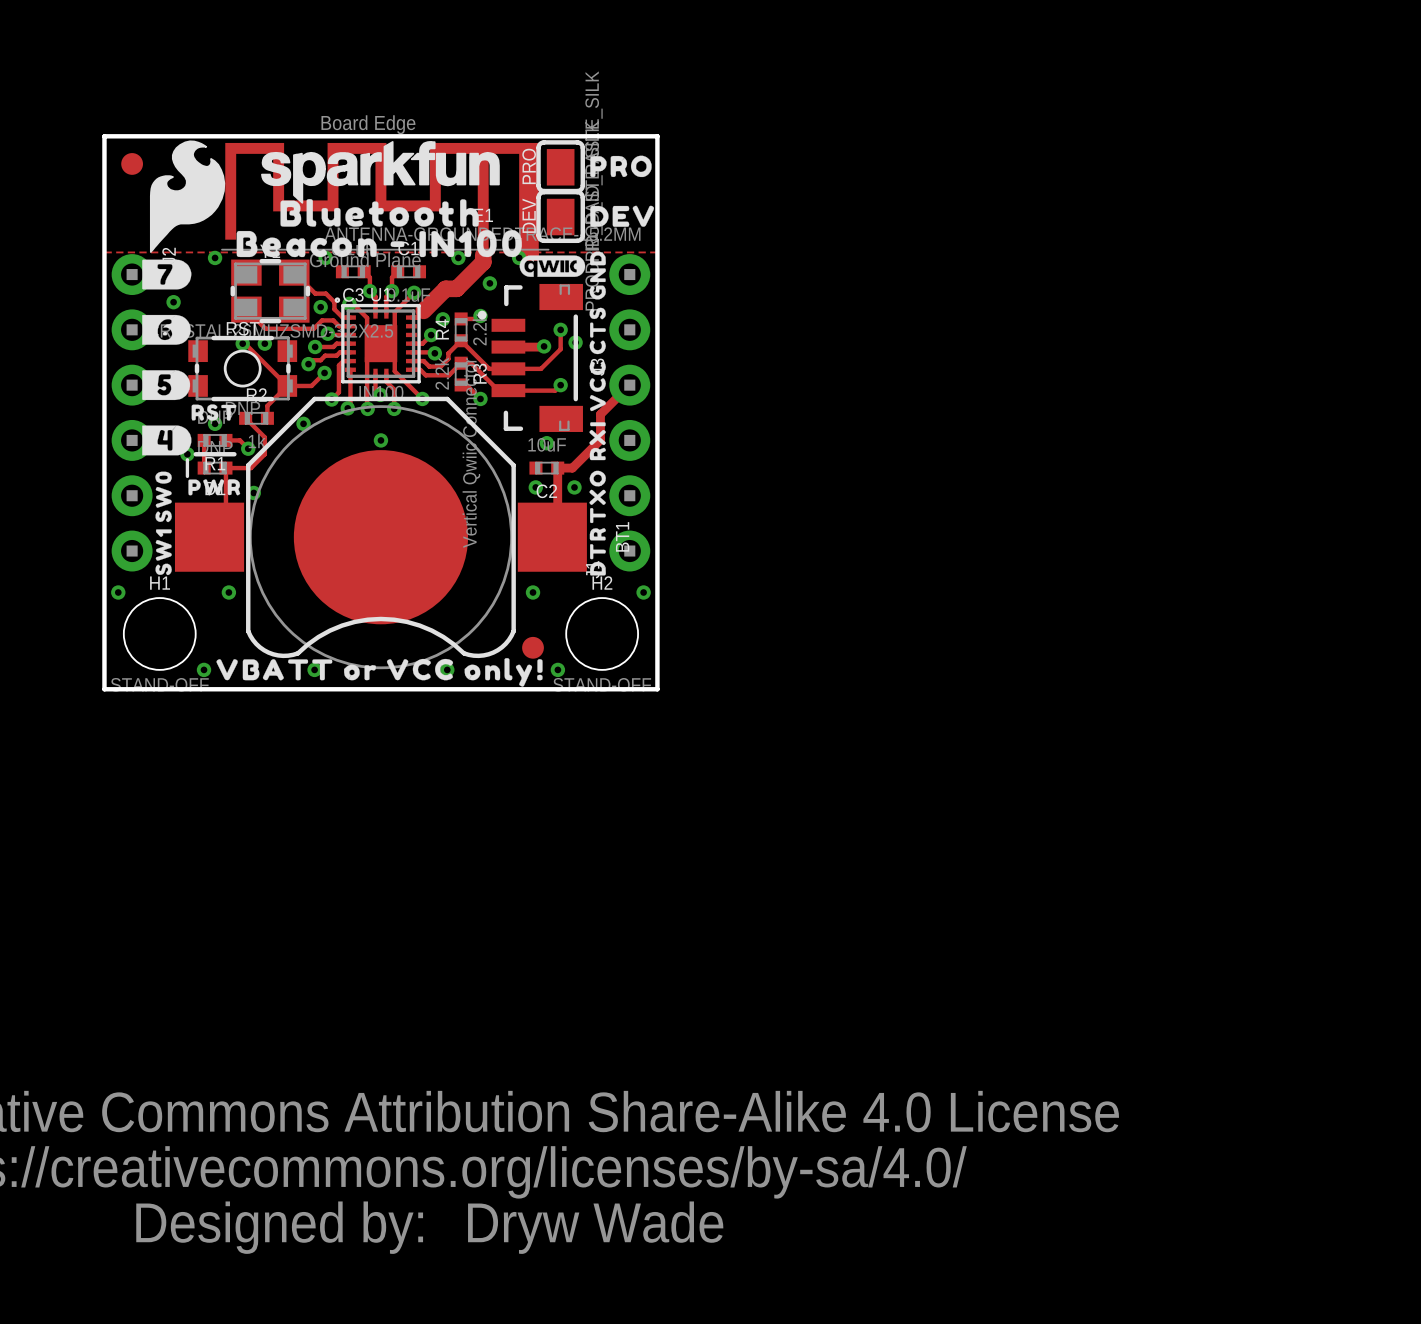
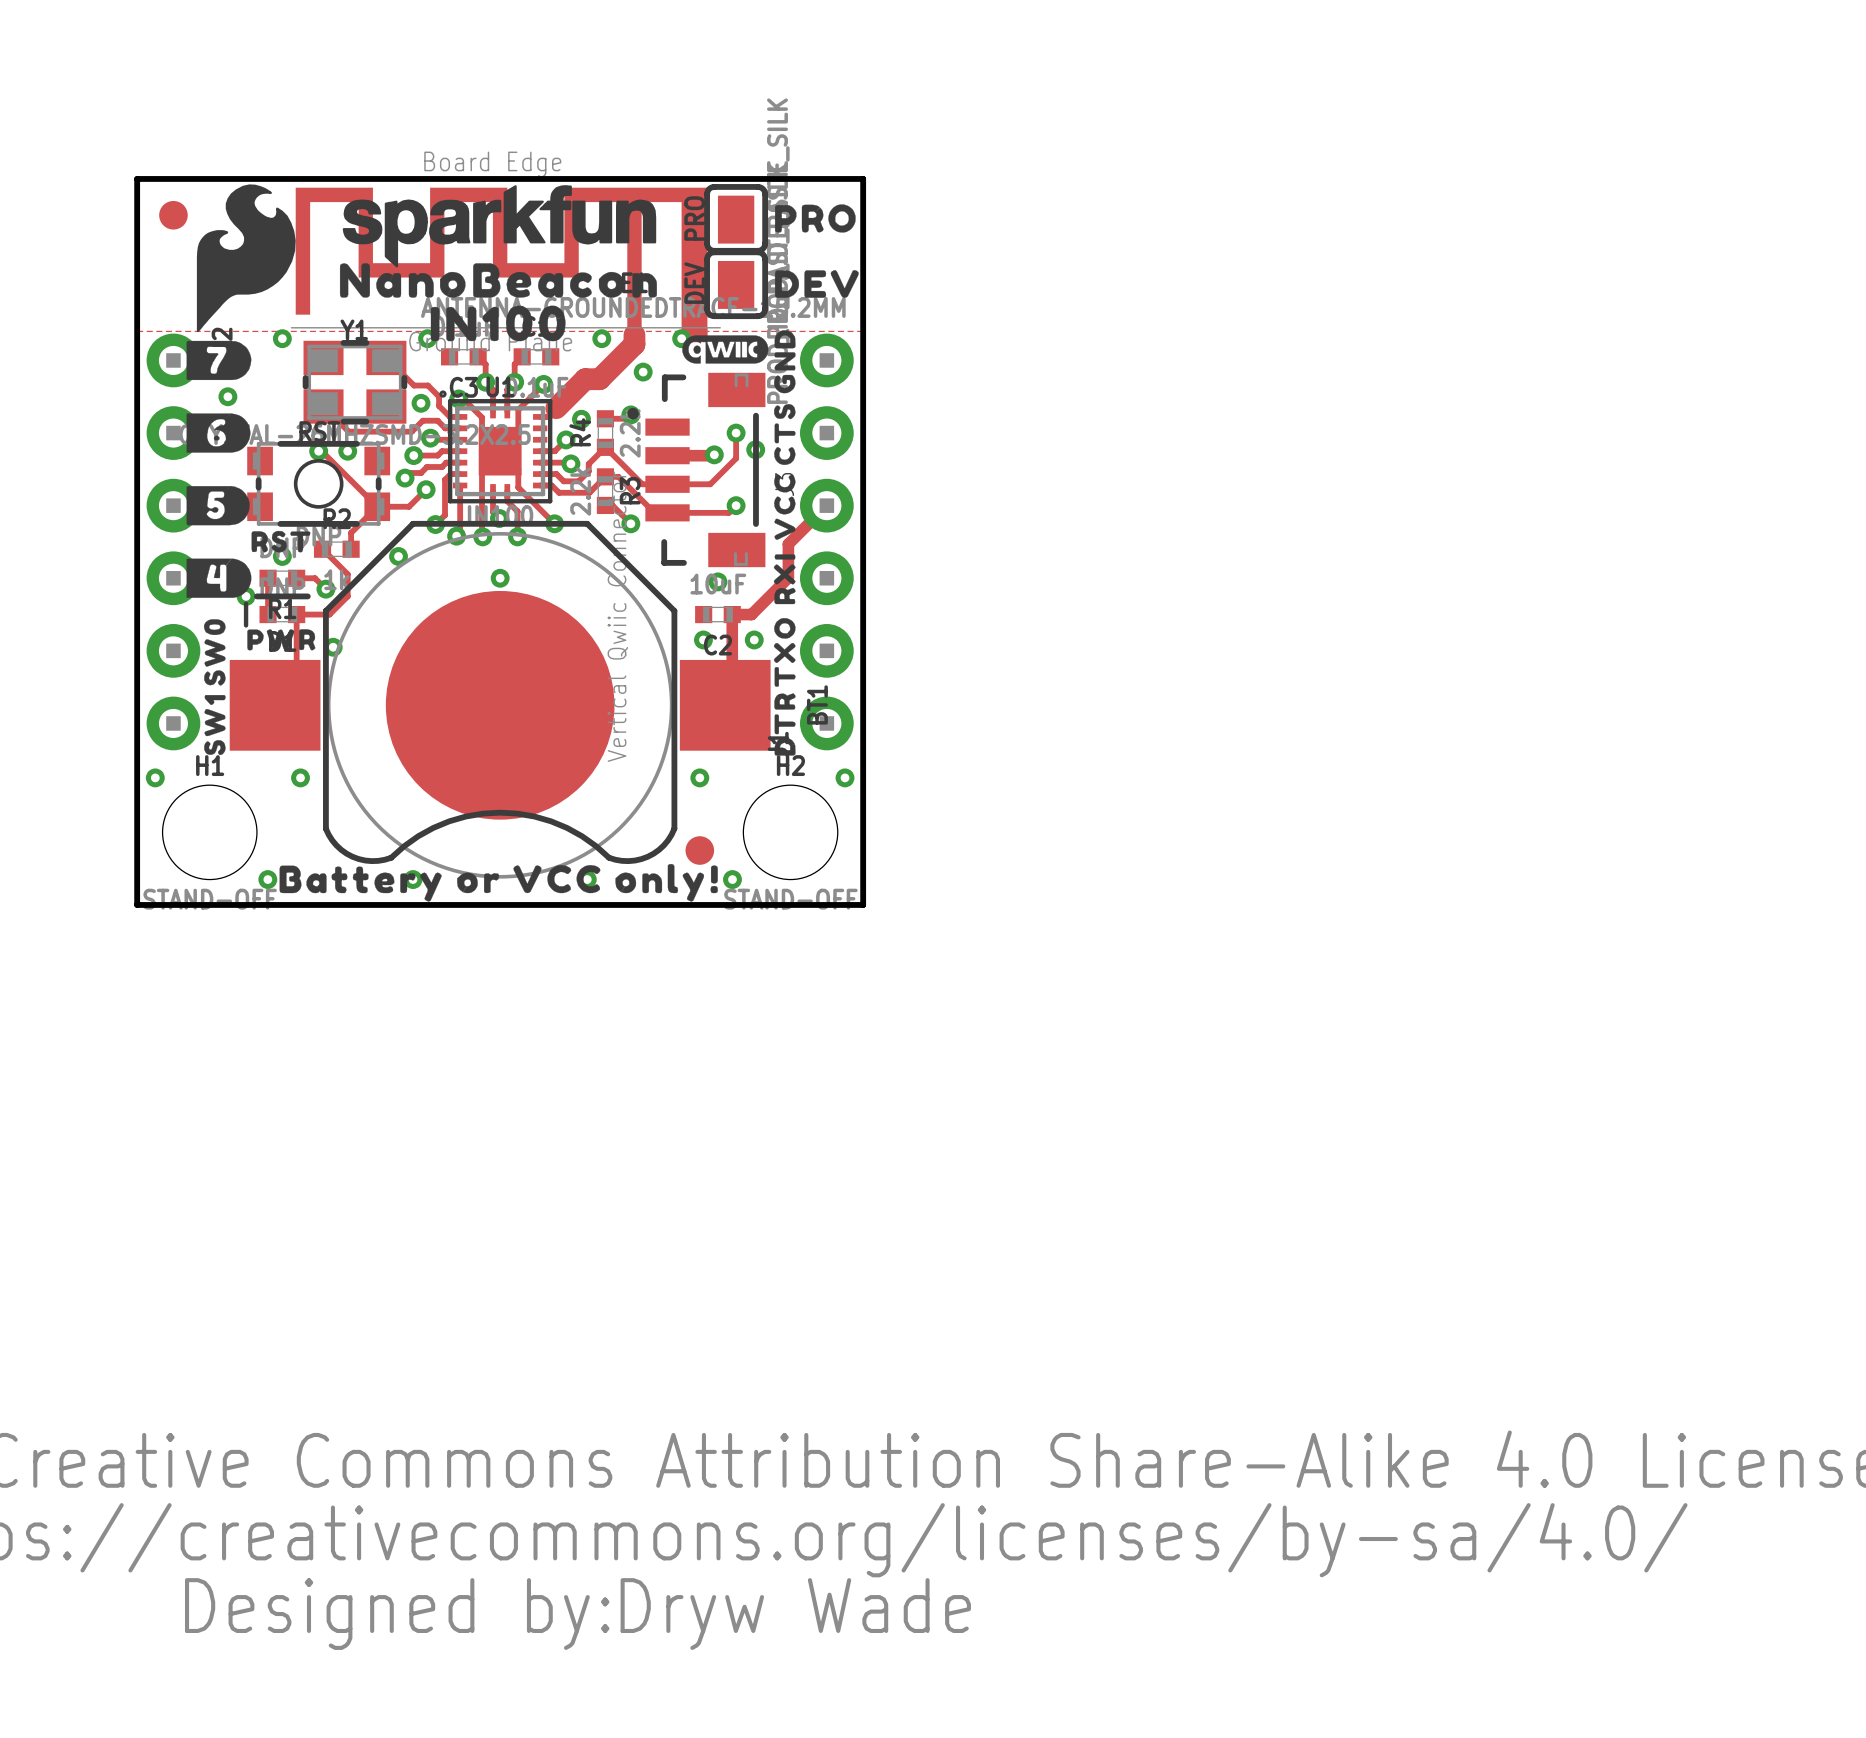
drawing shape: [280, 199, 479, 227] -> [339, 263, 657, 298]
drawing shape: [236, 230, 522, 258] -> [430, 305, 566, 342]
drawing shape: [216, 658, 543, 687] -> [279, 863, 718, 902]

